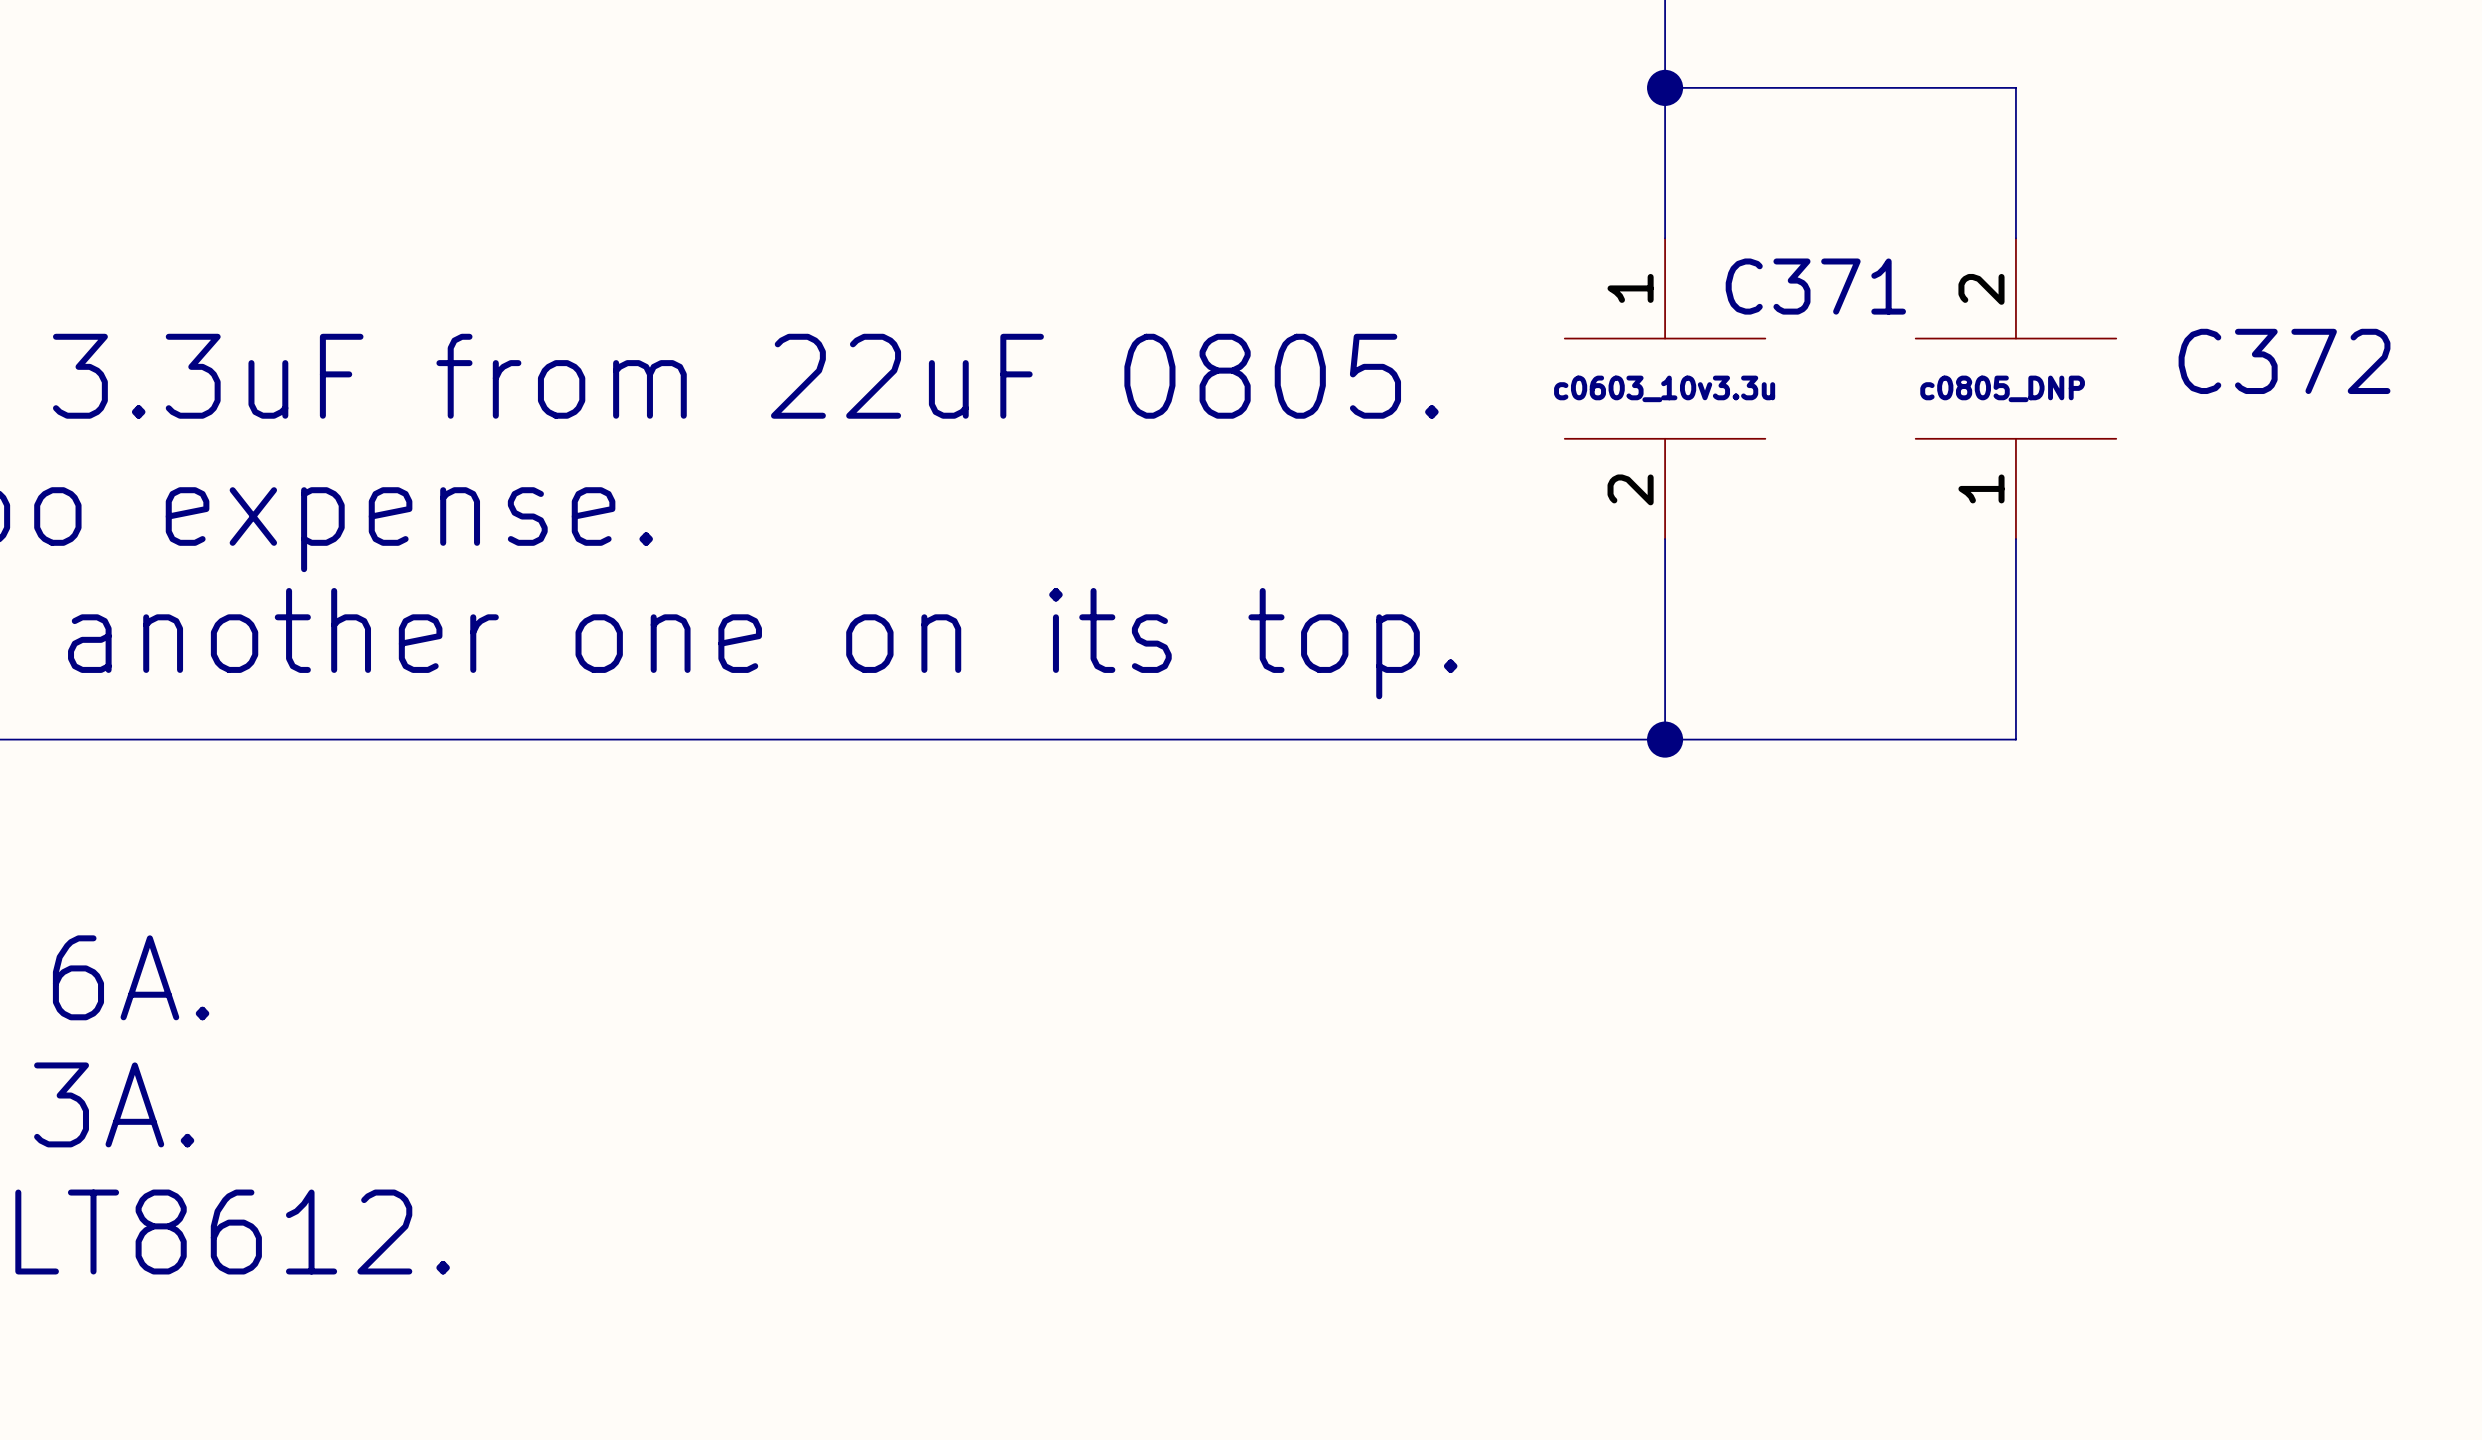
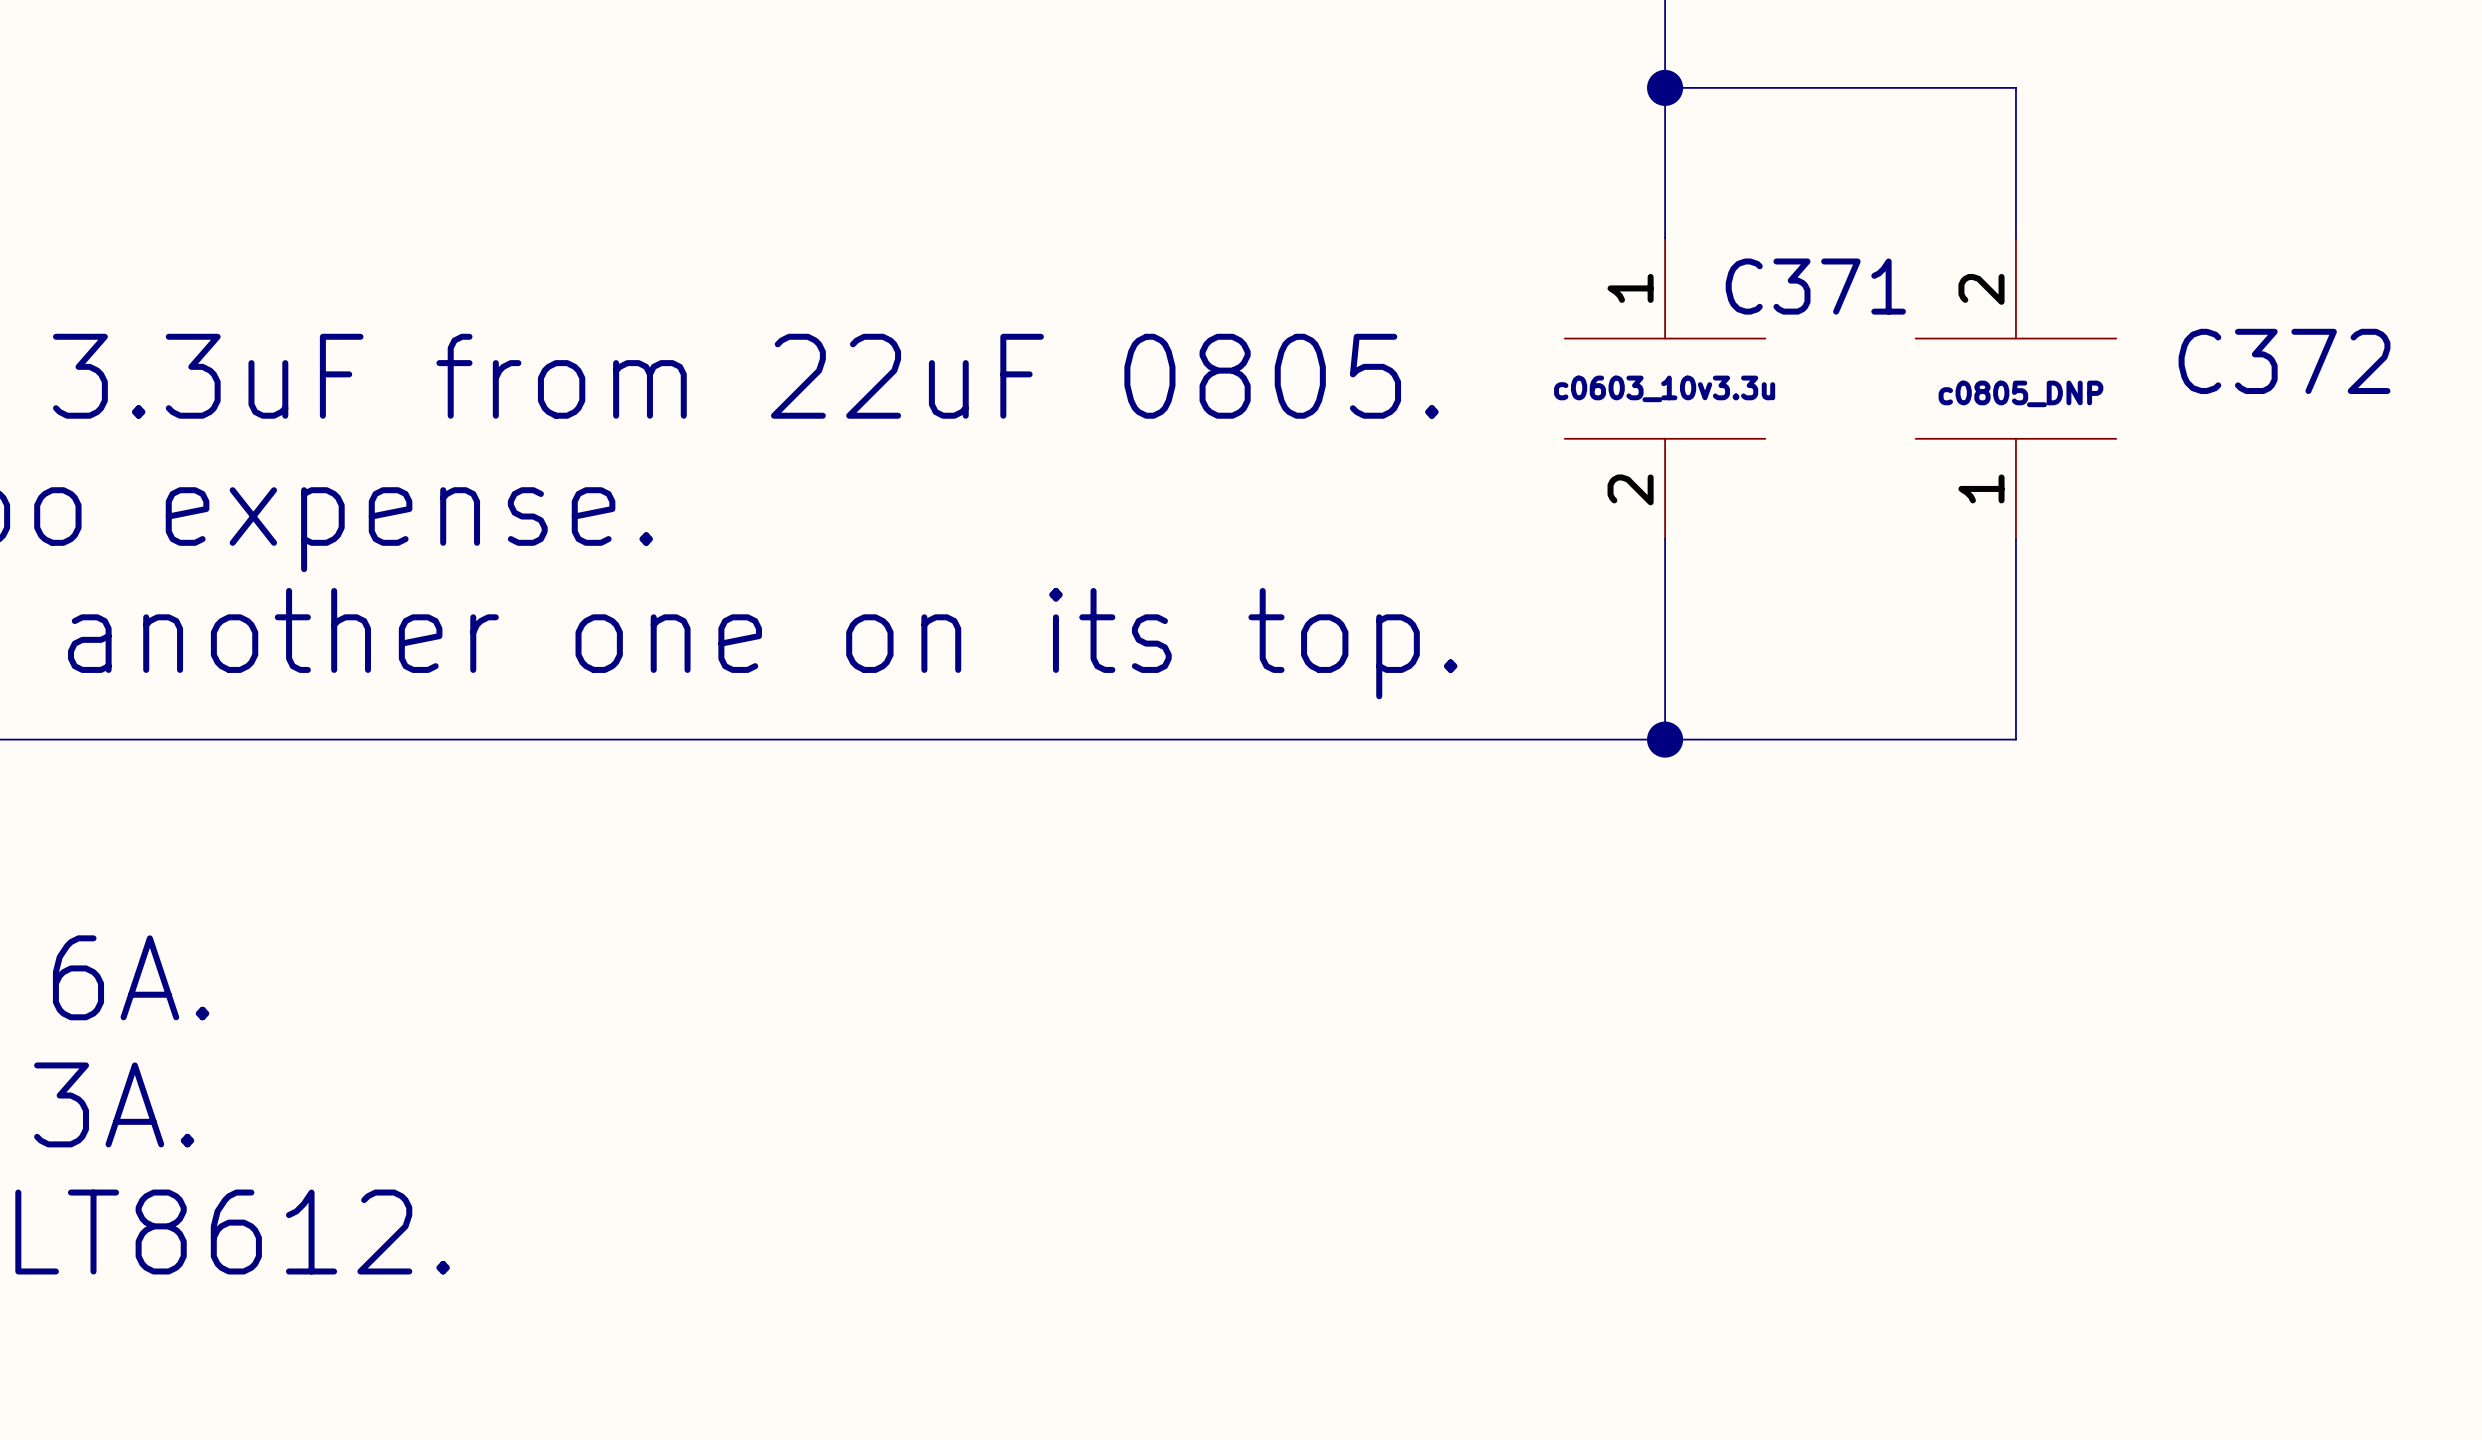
C372 value position: c0805_DNP (2002, 388) -> c0805_DNP (2020, 393)

